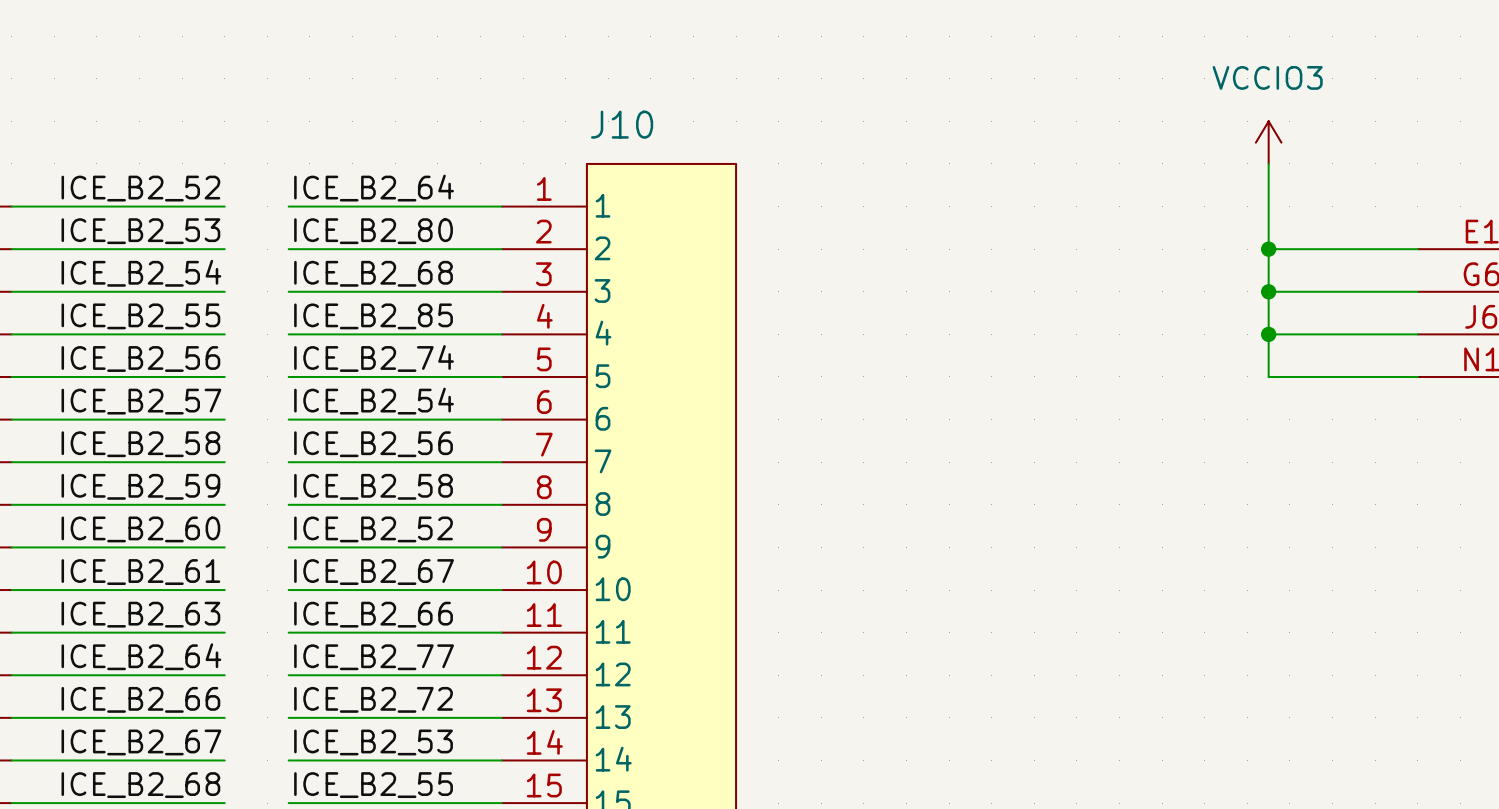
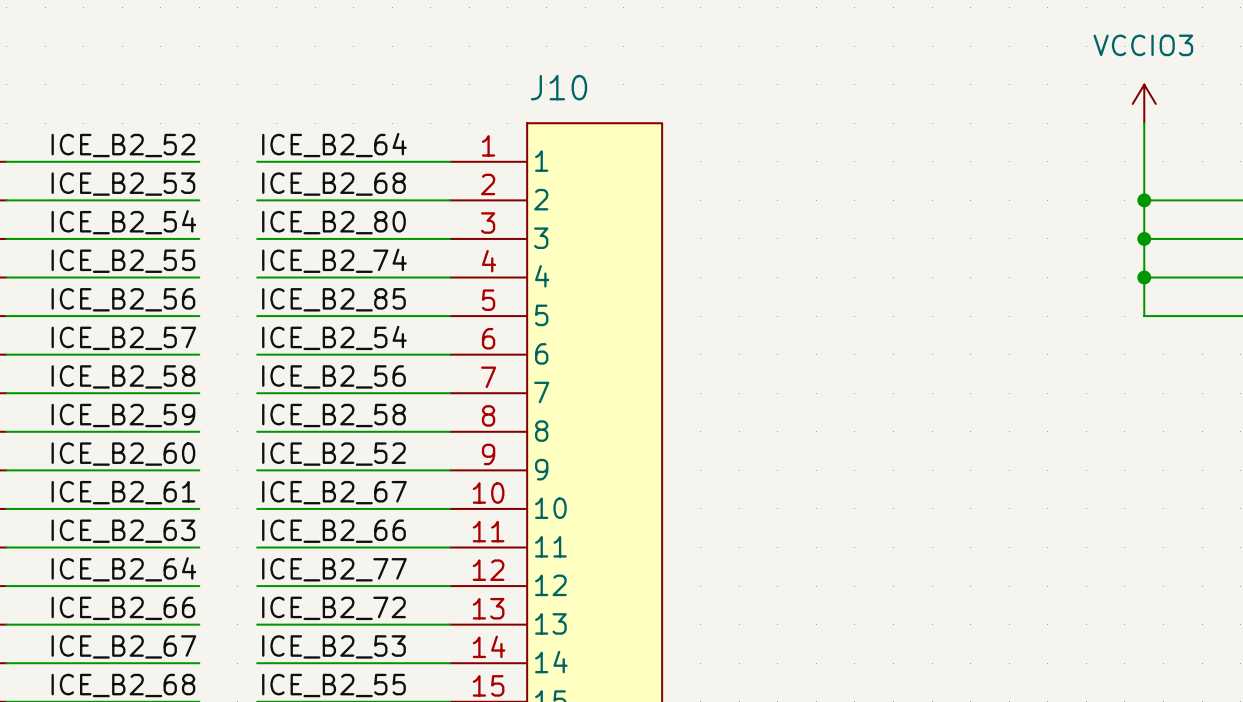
label: ICE_B2_80 (373, 231) -> ICE_B2_68 (333, 184)
label: ICE_B2_68 (373, 273) -> ICE_B2_80 (333, 222)
label: ICE_B2_85 (373, 316) -> ICE_B2_74 (334, 260)
label: ICE_B2_74 (374, 358) -> ICE_B2_85 (333, 299)

